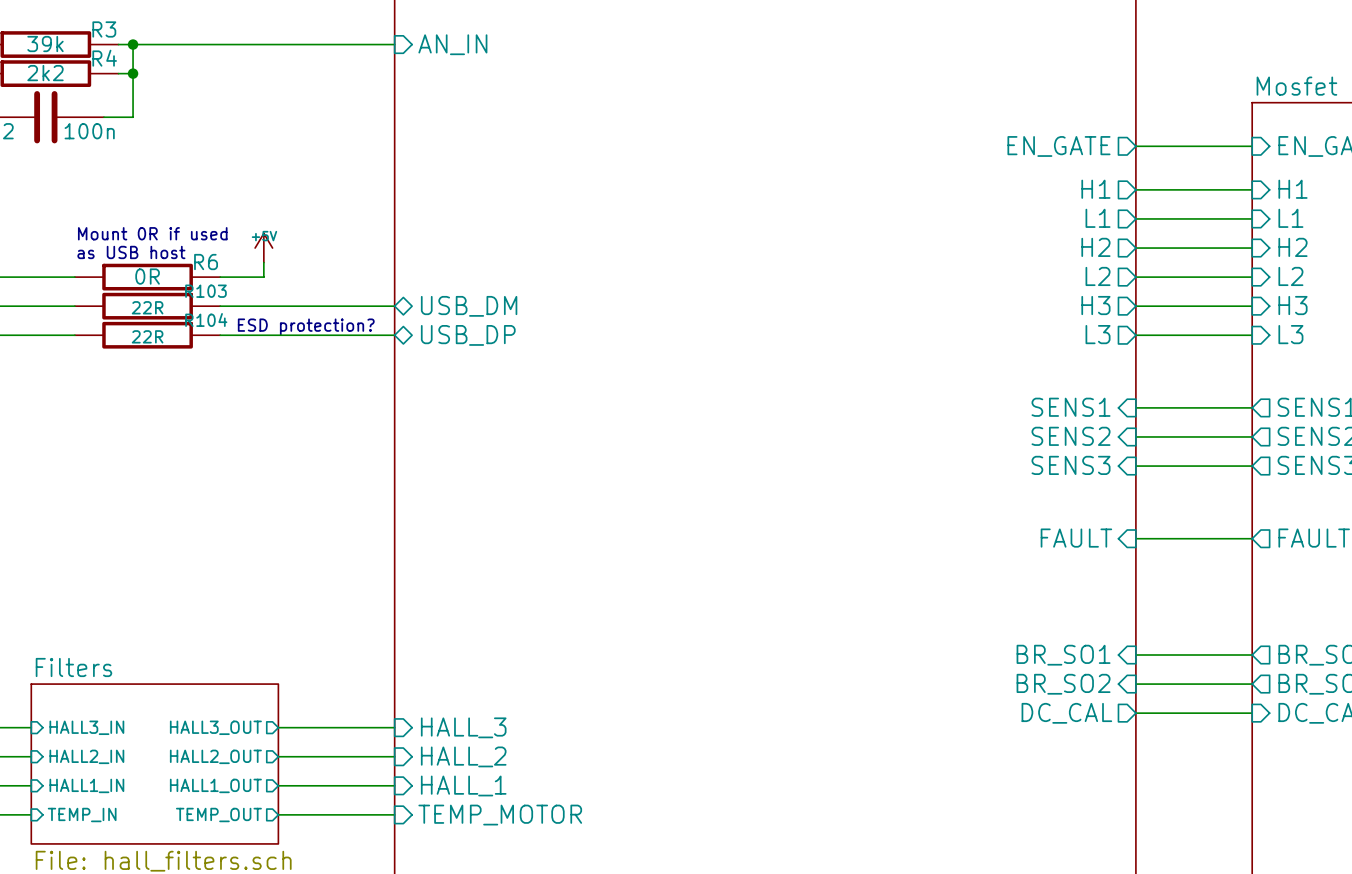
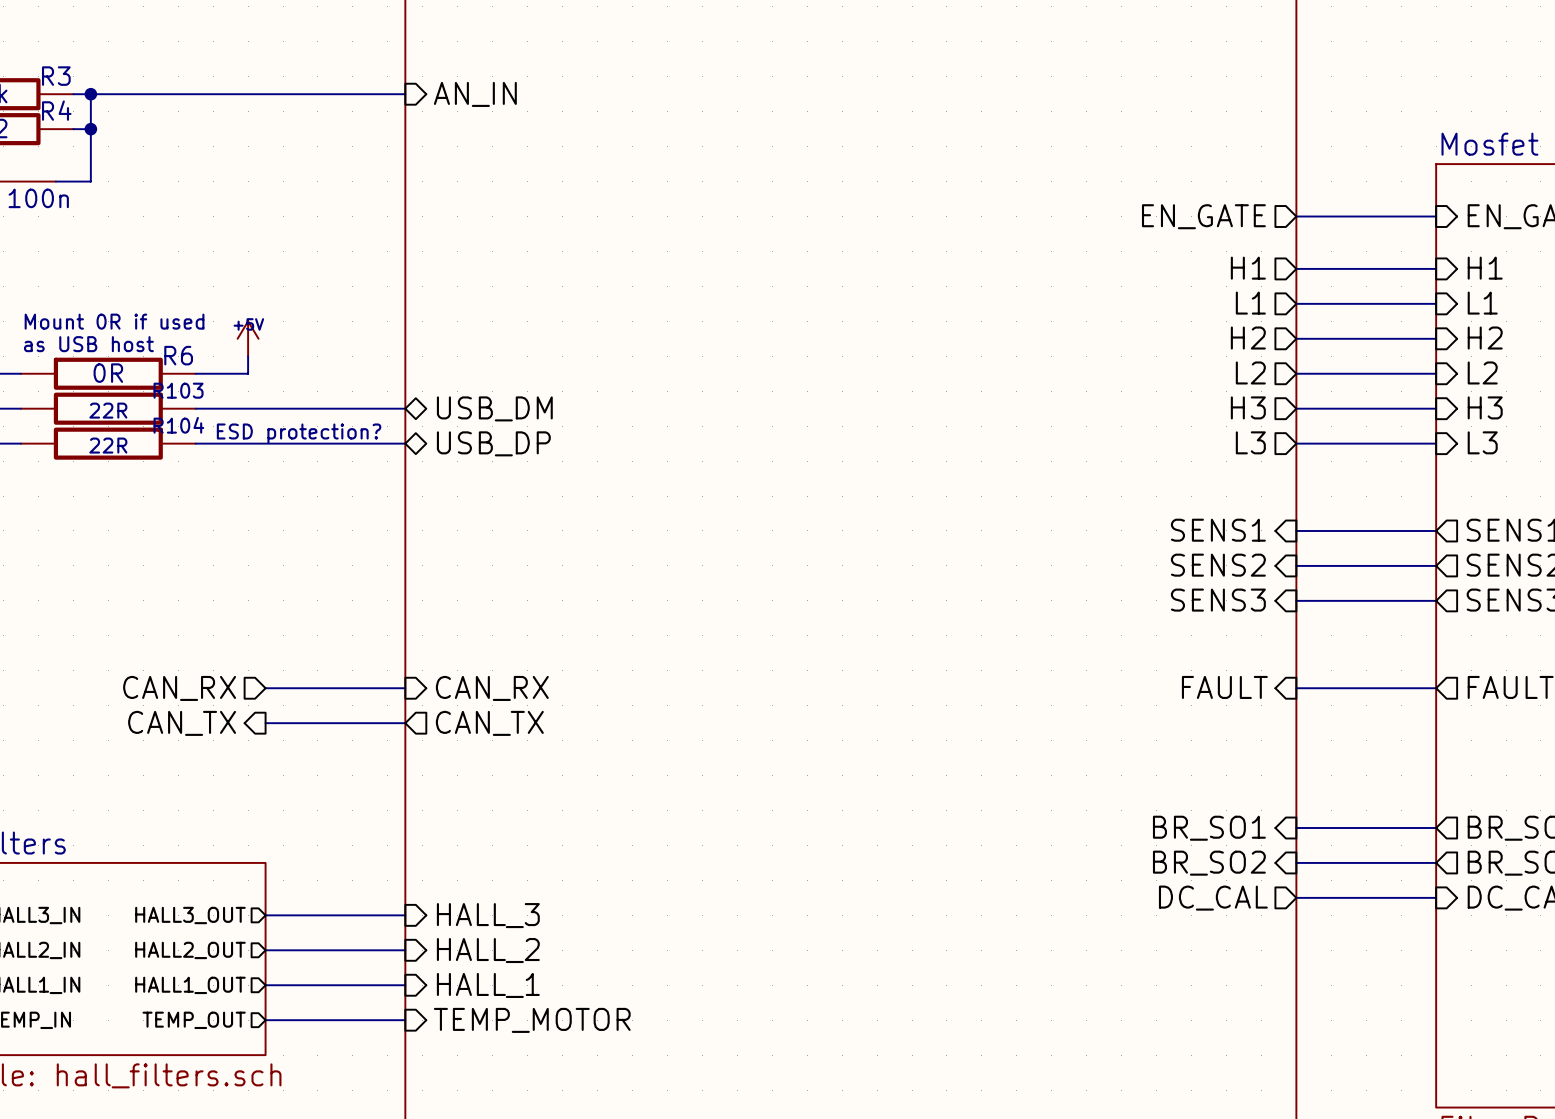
sheet pin: none -> CAN_RX (179, 688)
wire: none -> (265, 688) (405, 688)
sheet pin: none -> CAN_RX (492, 688)
sheet pin: none -> CAN_TX (182, 723)
wire: none -> (265, 723) (405, 723)
sheet pin: none -> CAN_TX (489, 723)

